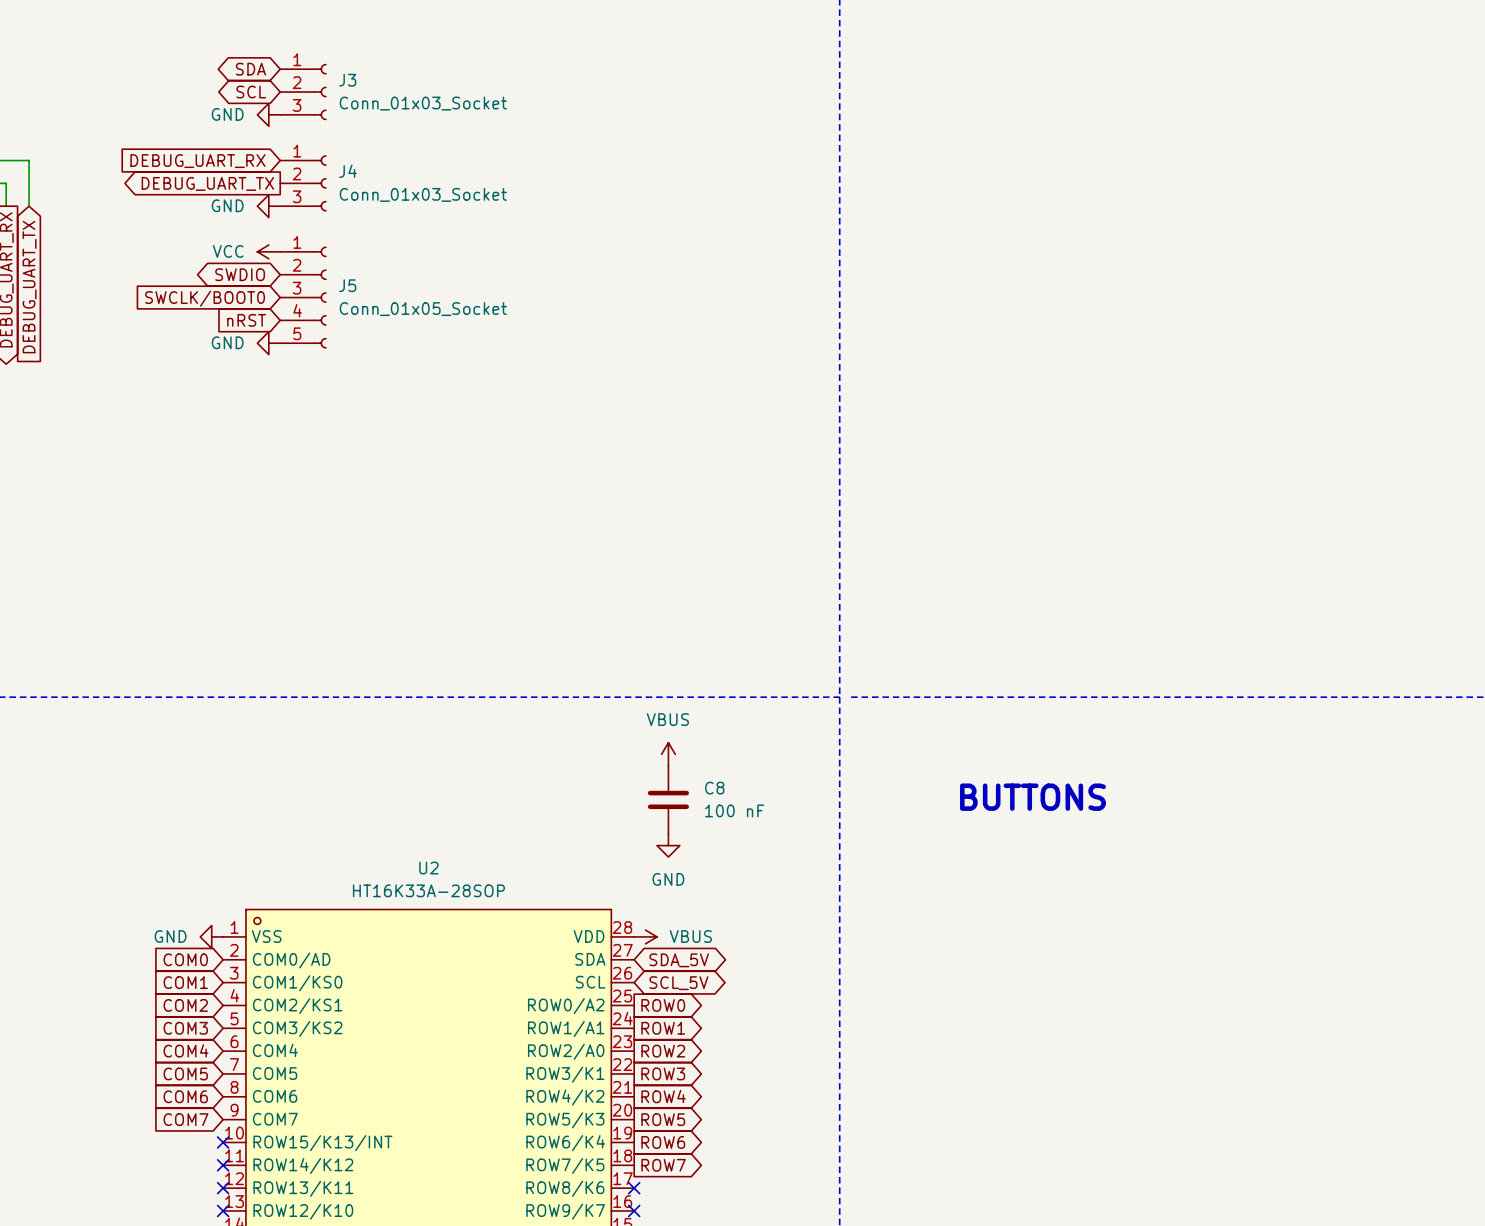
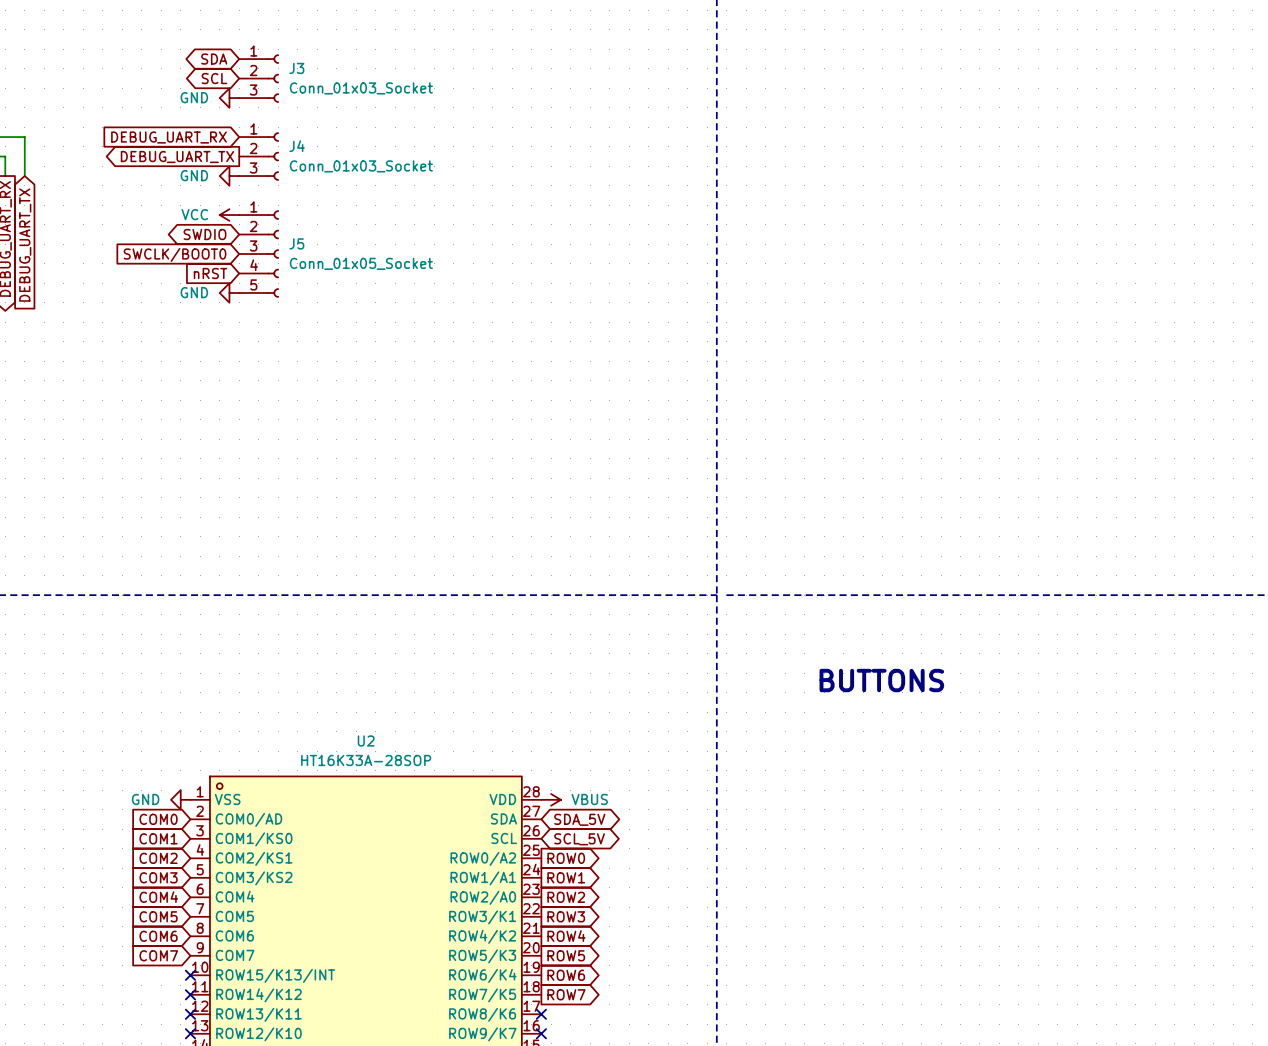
power symbol: VBUS (668, 754) -> none
C8: 100 nF (668, 799) -> none
power symbol: GND (668, 845) -> none

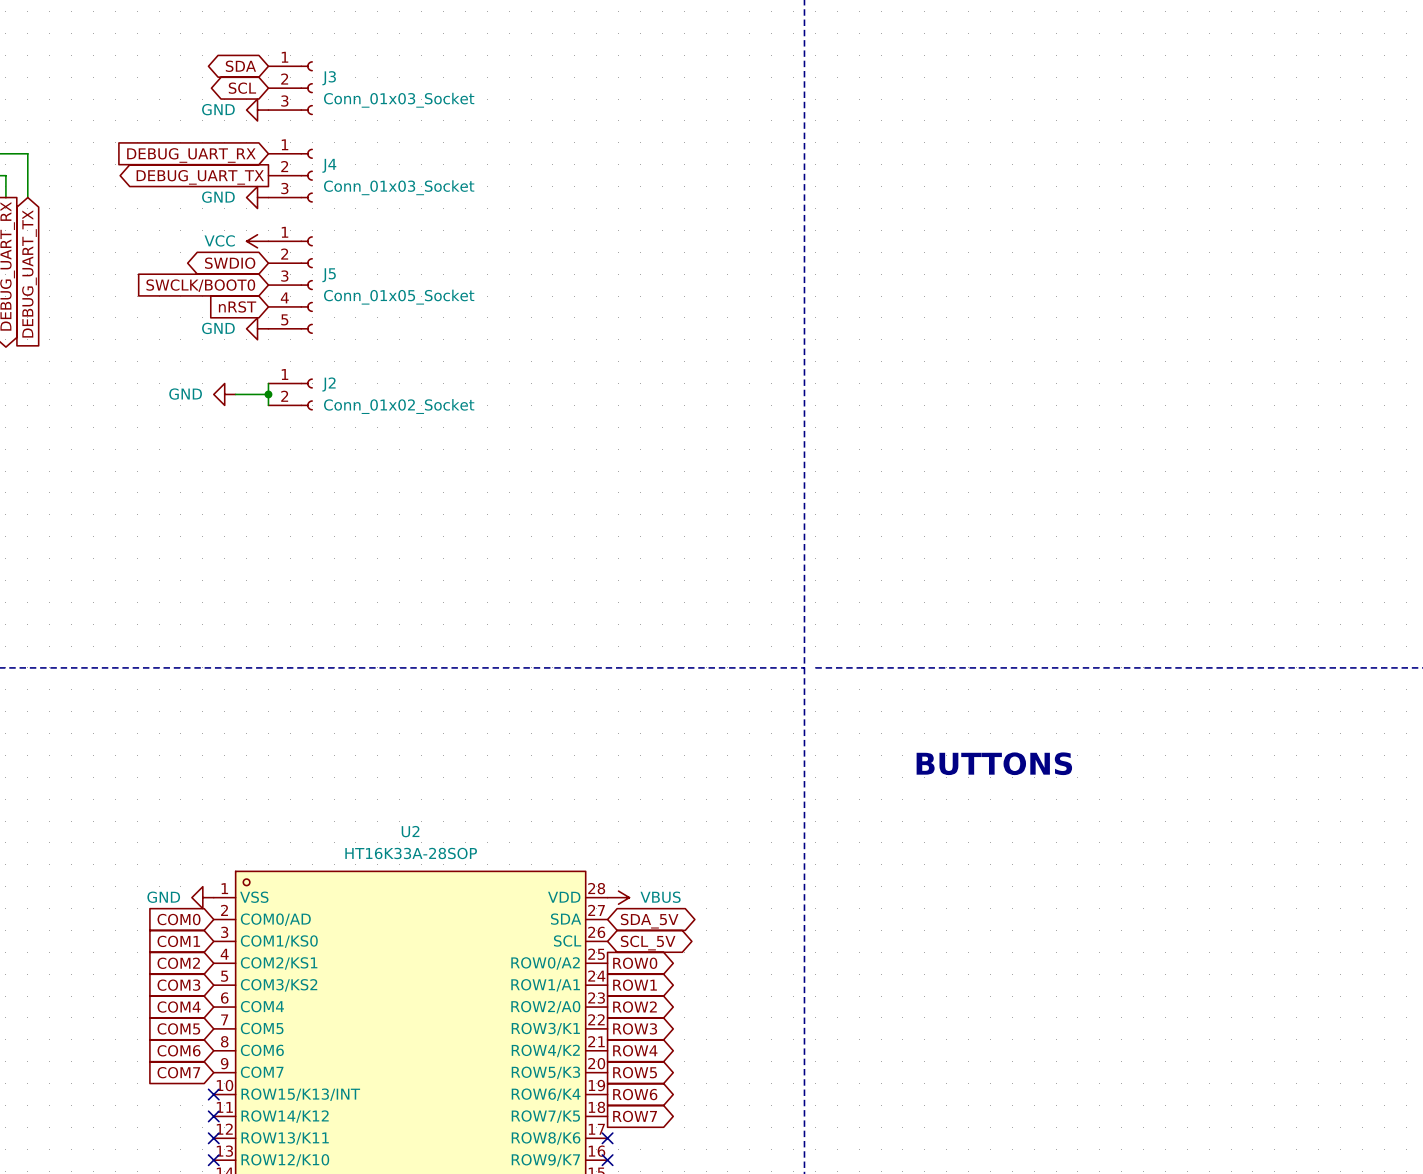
wire: none -> (268, 383) (268, 405)
power symbol: none -> GND (224, 394)
wire: none -> (235, 394) (268, 394)
junction: none -> (268, 394)
J2: none -> Conn_01x02_Socket (290, 394)

